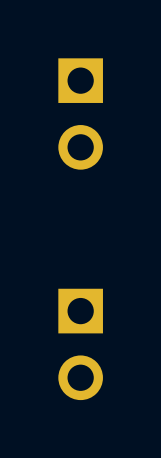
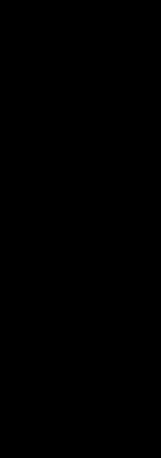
part: (80, 114) -> none
part: (80, 344) -> none

